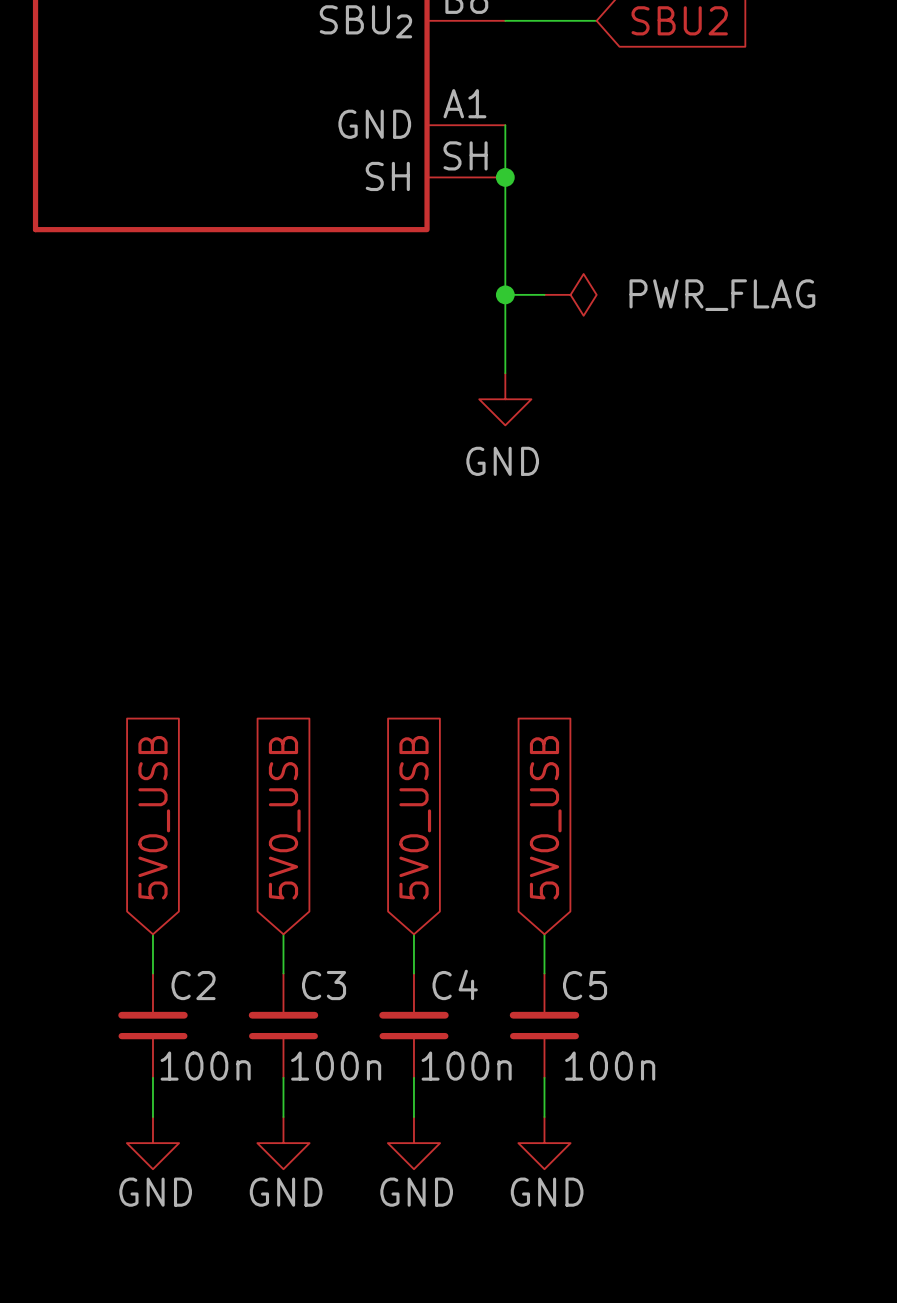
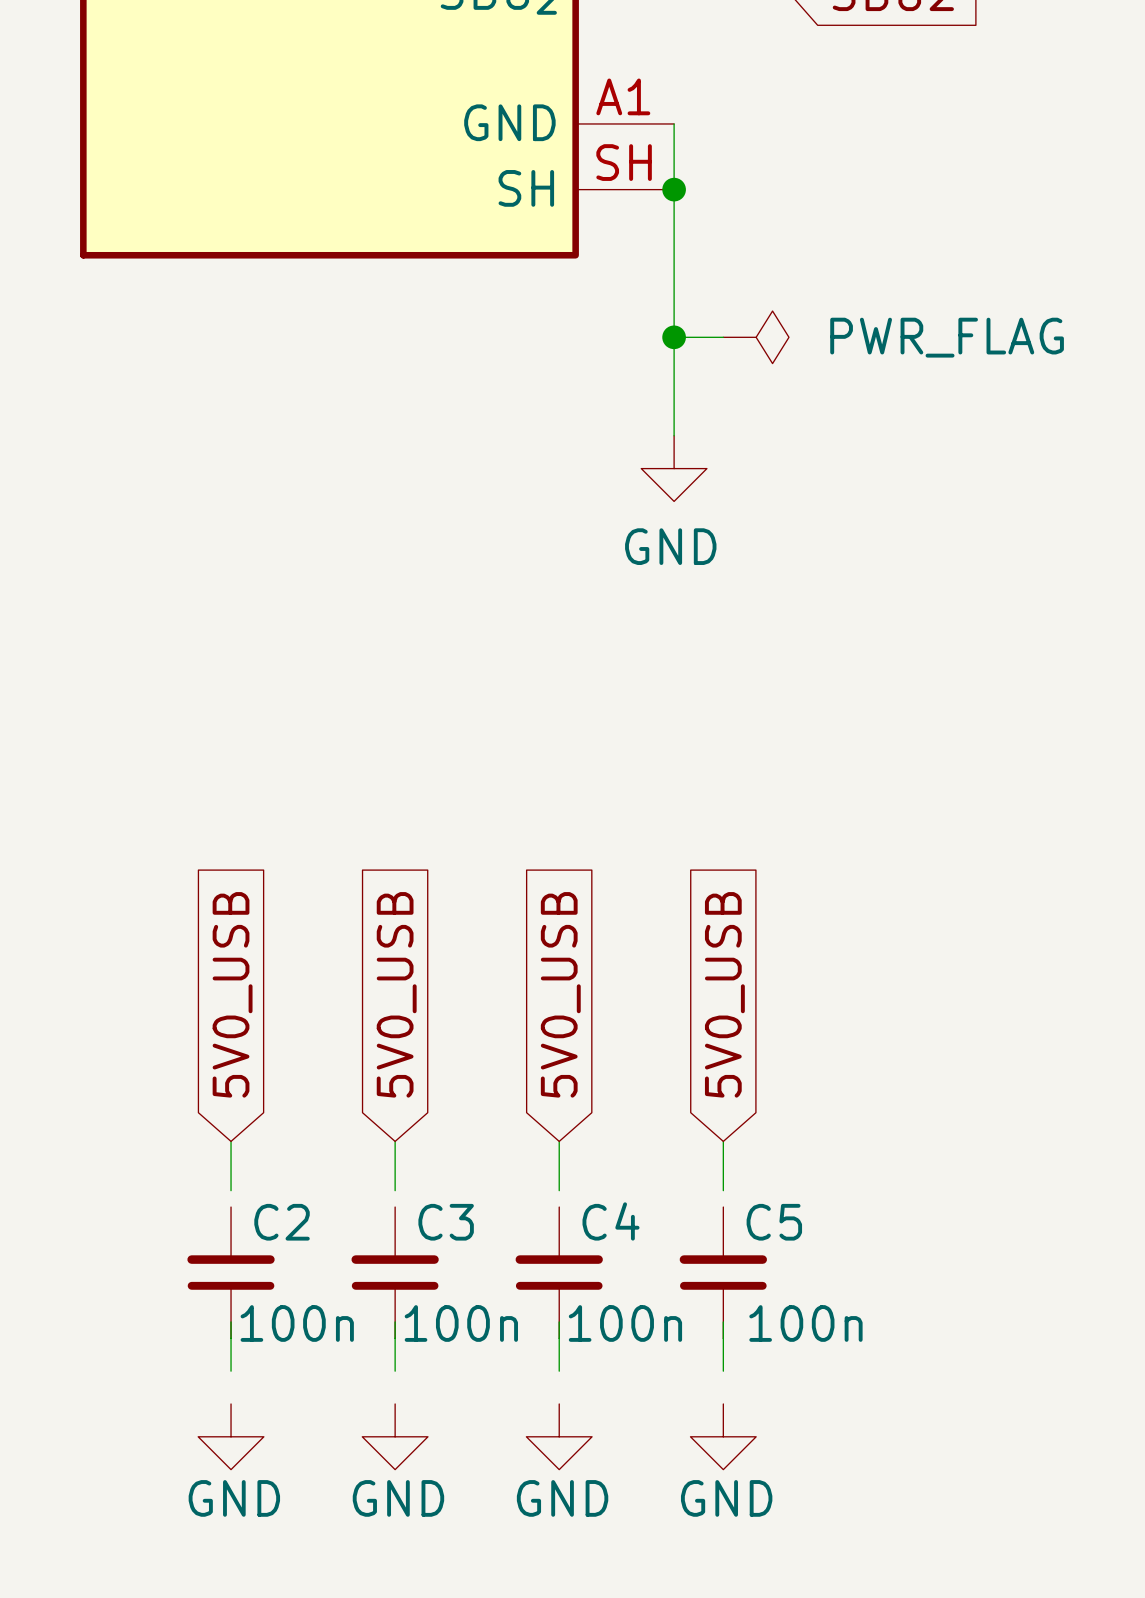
C2 position: (152, 1025) -> (231, 1272)
C3 position: (283, 1025) -> (395, 1272)
C4 position: (413, 1025) -> (559, 1272)
C5 position: (544, 1025) -> (723, 1272)
power symbol position: GND (152, 1143) -> GND (231, 1436)
power symbol position: GND (283, 1143) -> GND (395, 1436)
power symbol position: GND (413, 1143) -> GND (559, 1436)
power symbol position: GND (544, 1143) -> GND (723, 1436)

